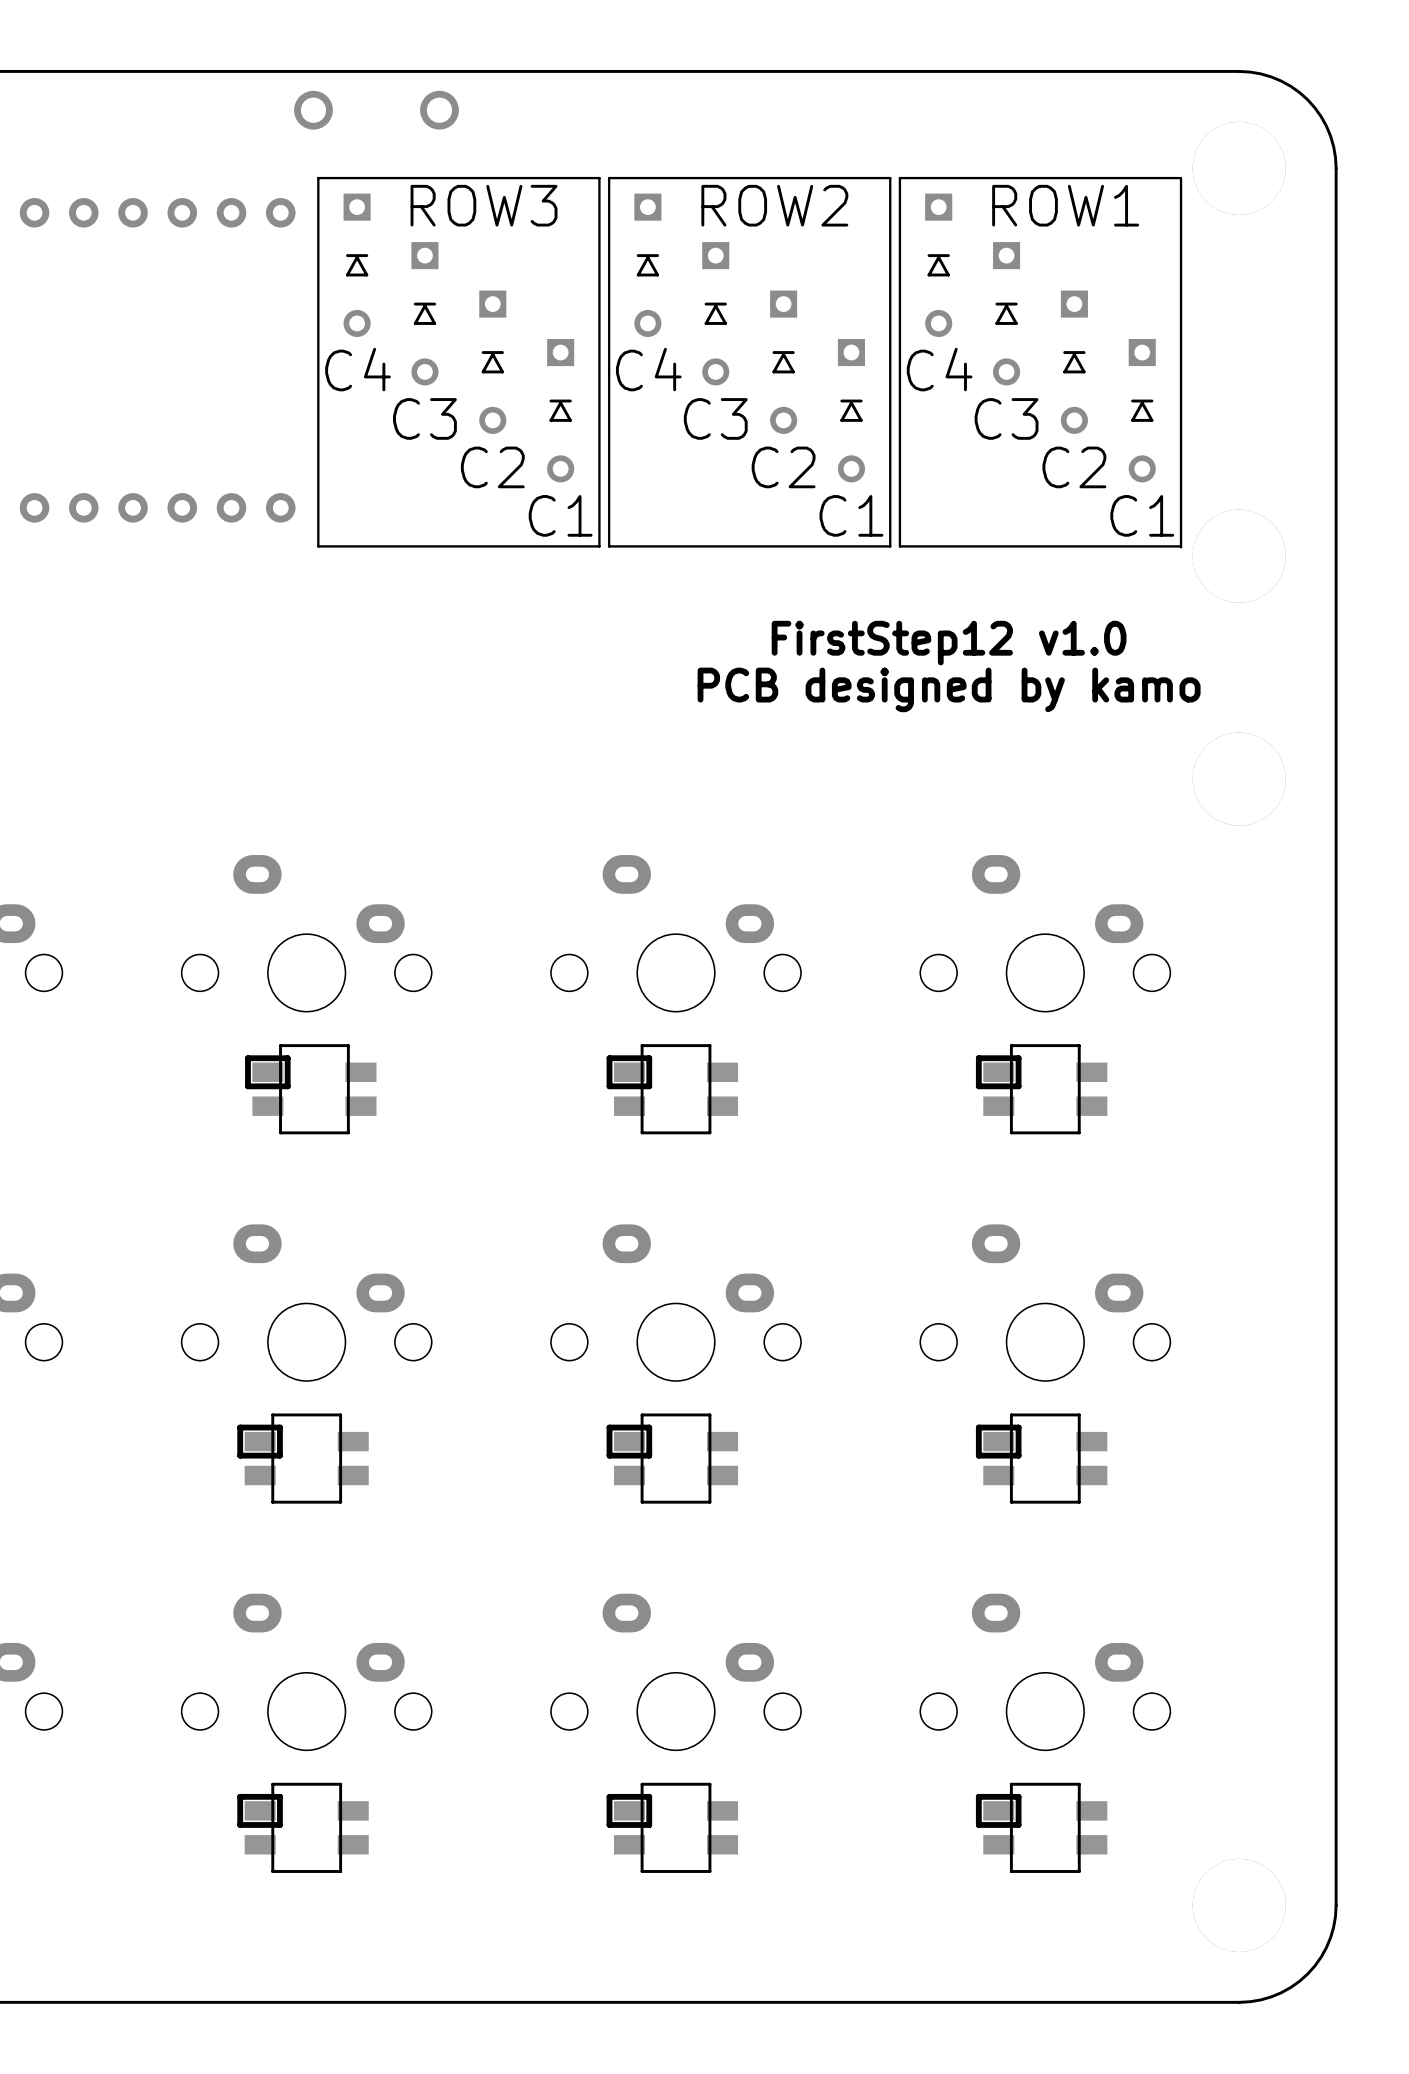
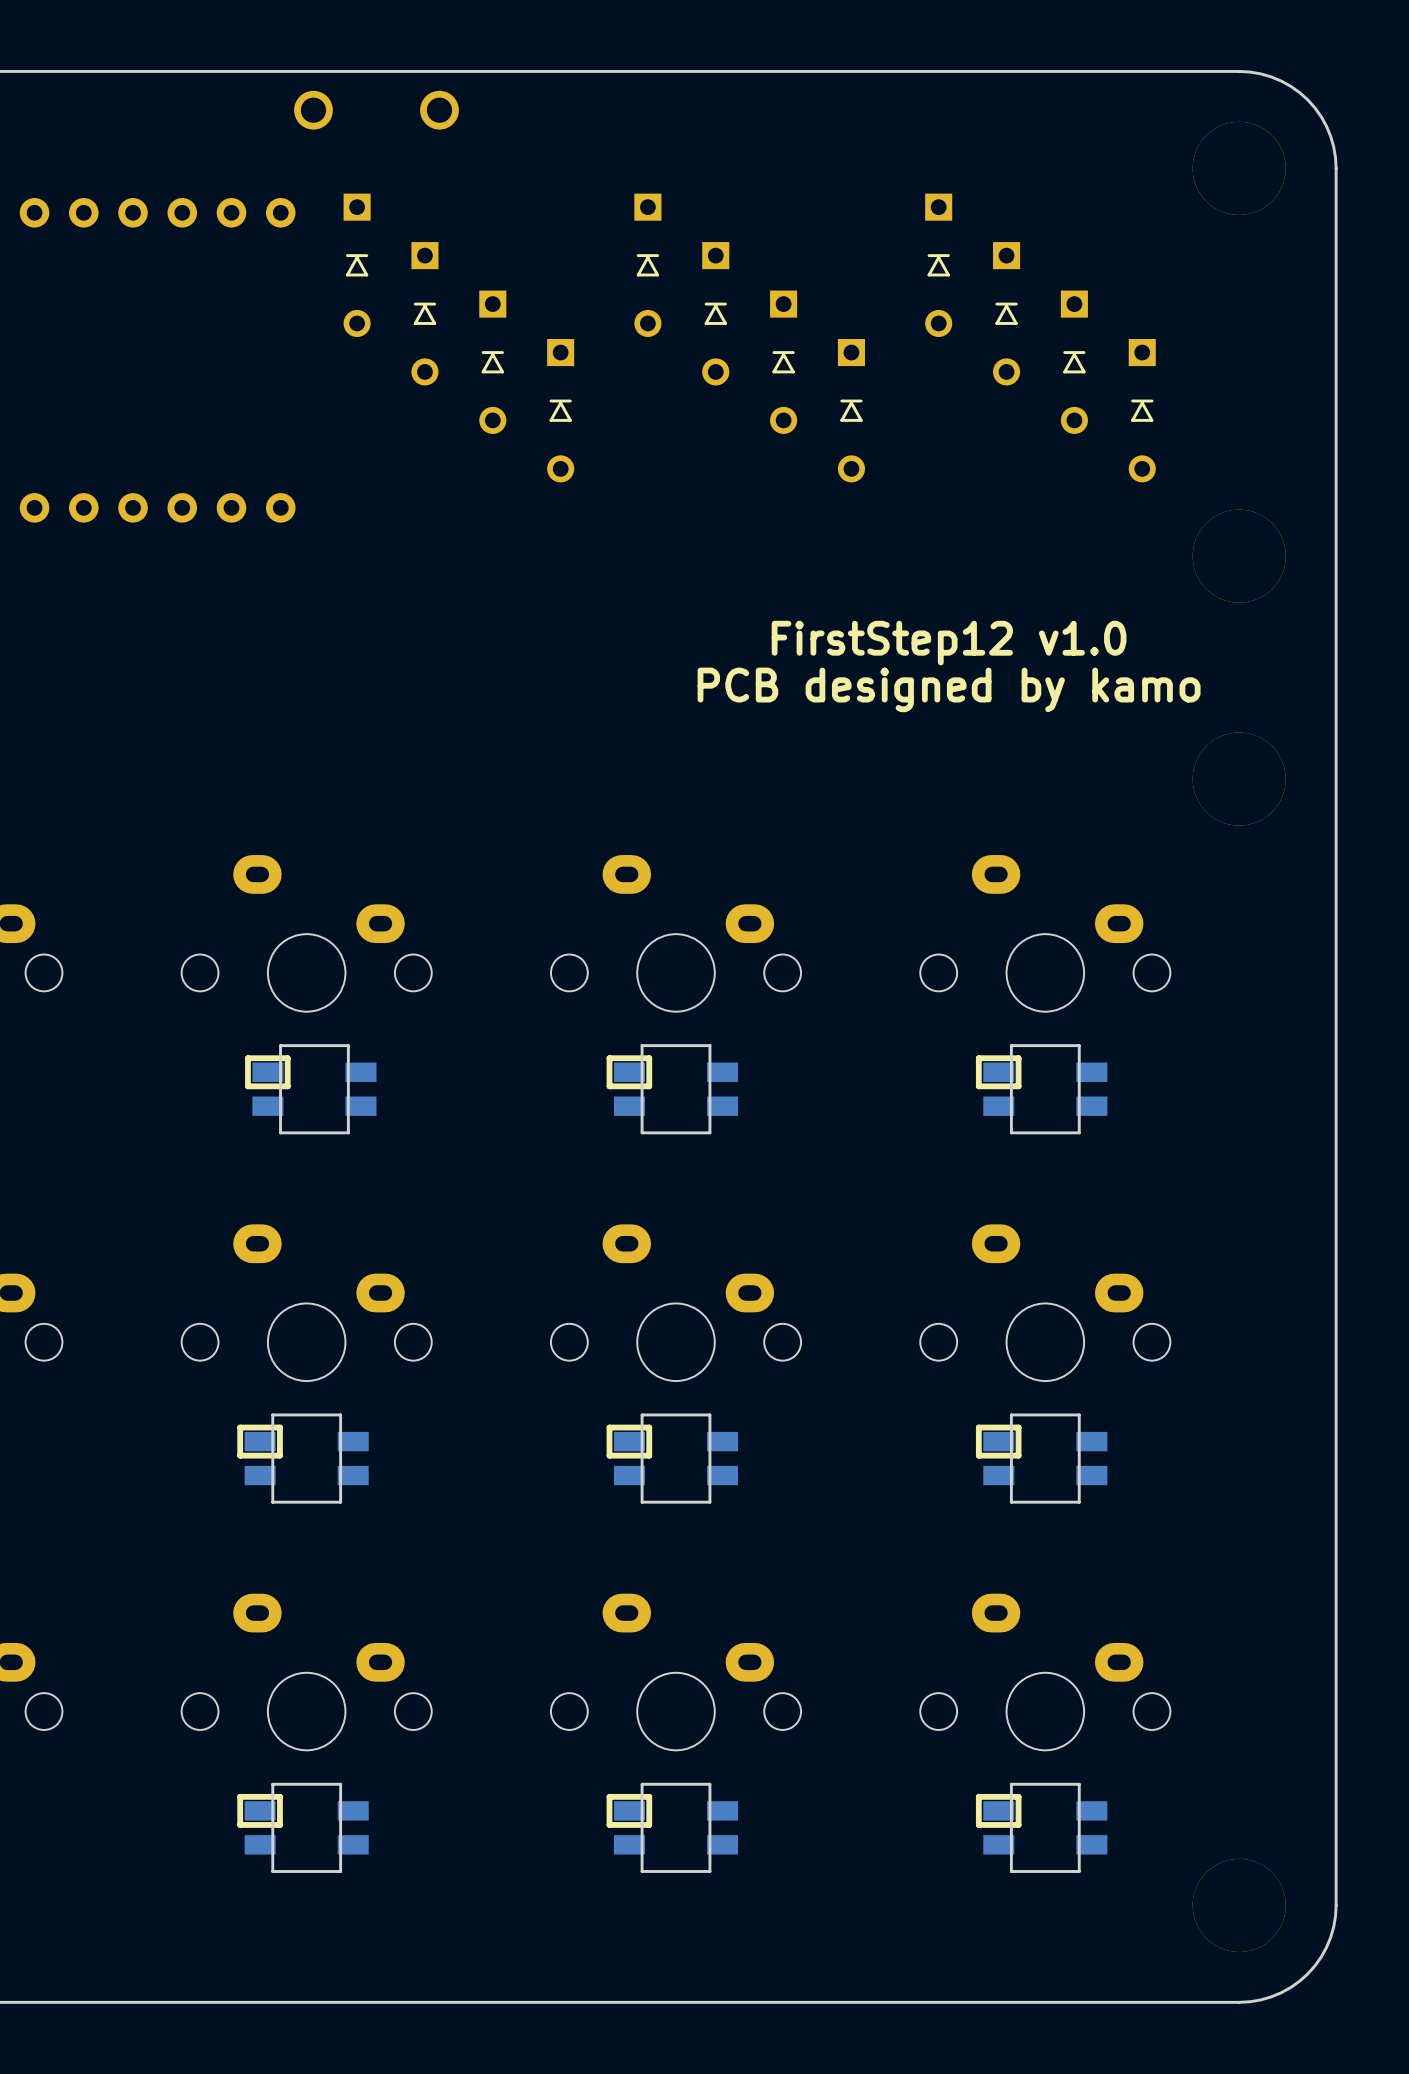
line: (599, 178) (599, 546) (318, 546) (318, 178) (599, 178) -> none
line: (890, 178) (609, 178) (609, 546) (890, 546) (890, 178) -> none
line: (1181, 178) (899, 178) (899, 546) (1181, 546) -> none
line: (1181, 179) (1181, 547) -> none
text: ROW3 (484, 205) -> none
text: ROW2 (774, 205) -> none
text: ROW1 (1065, 205) -> none
text: C4 (358, 369) -> none
text: C4 (648, 369) -> none
text: C4 (939, 369) -> none
text: C3 (424, 418) -> none
text: C3 (715, 418) -> none
text: C3 (1006, 418) -> none
text: C2 (492, 467) -> none
text: C2 (783, 467) -> none
text: C2 (1074, 467) -> none
text: C1 (560, 515) -> none
text: C1 (851, 515) -> none
text: C1 (1142, 515) -> none

